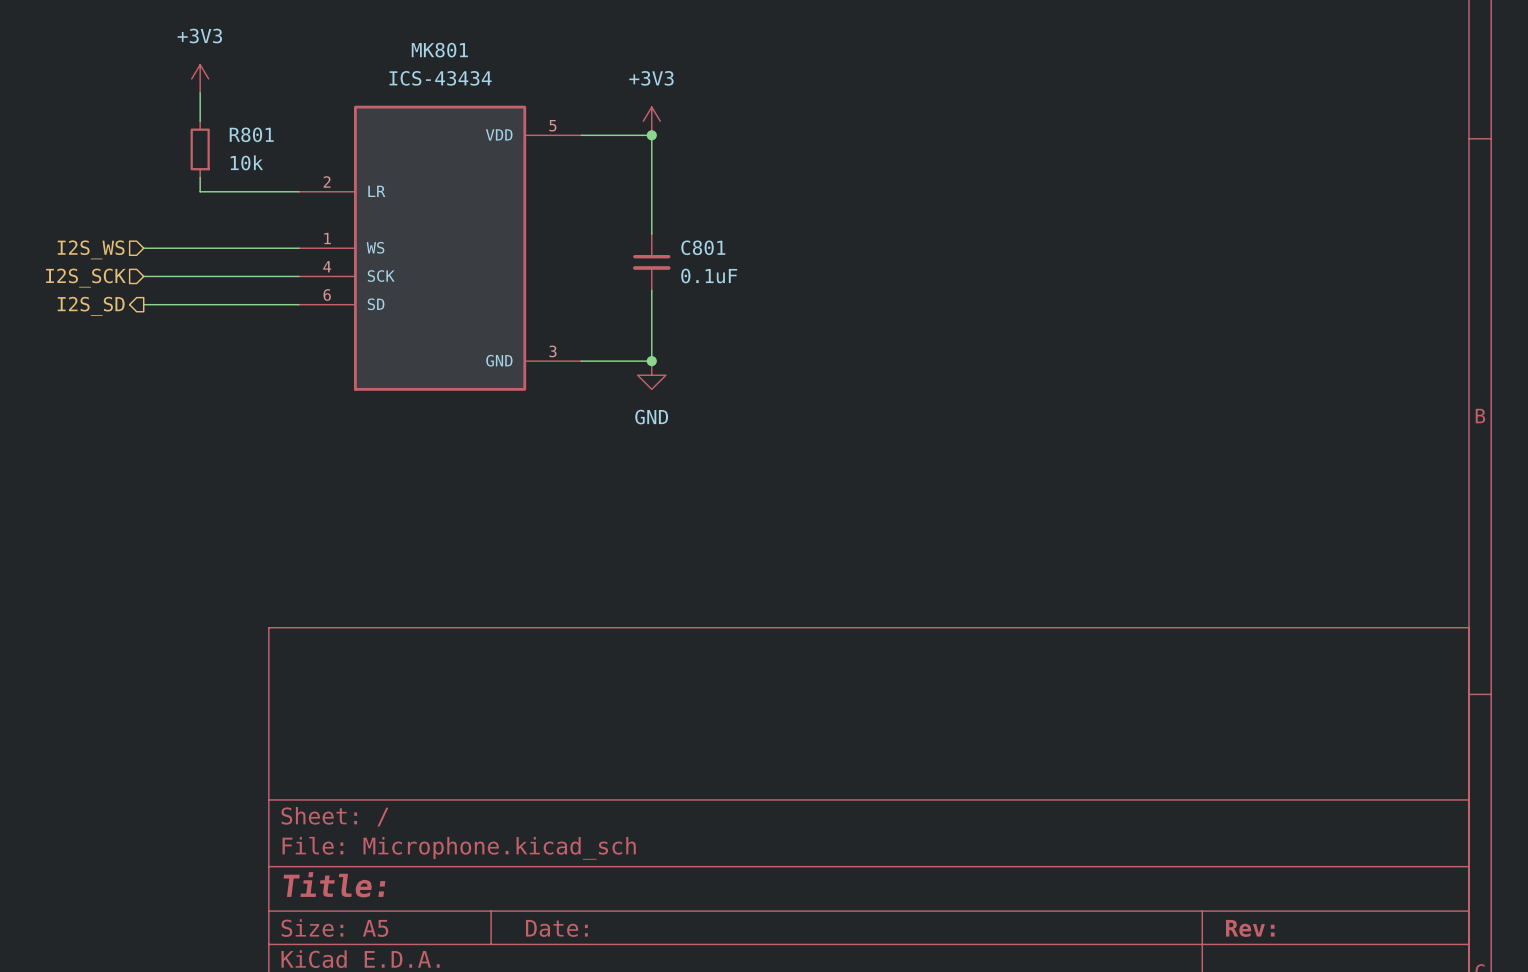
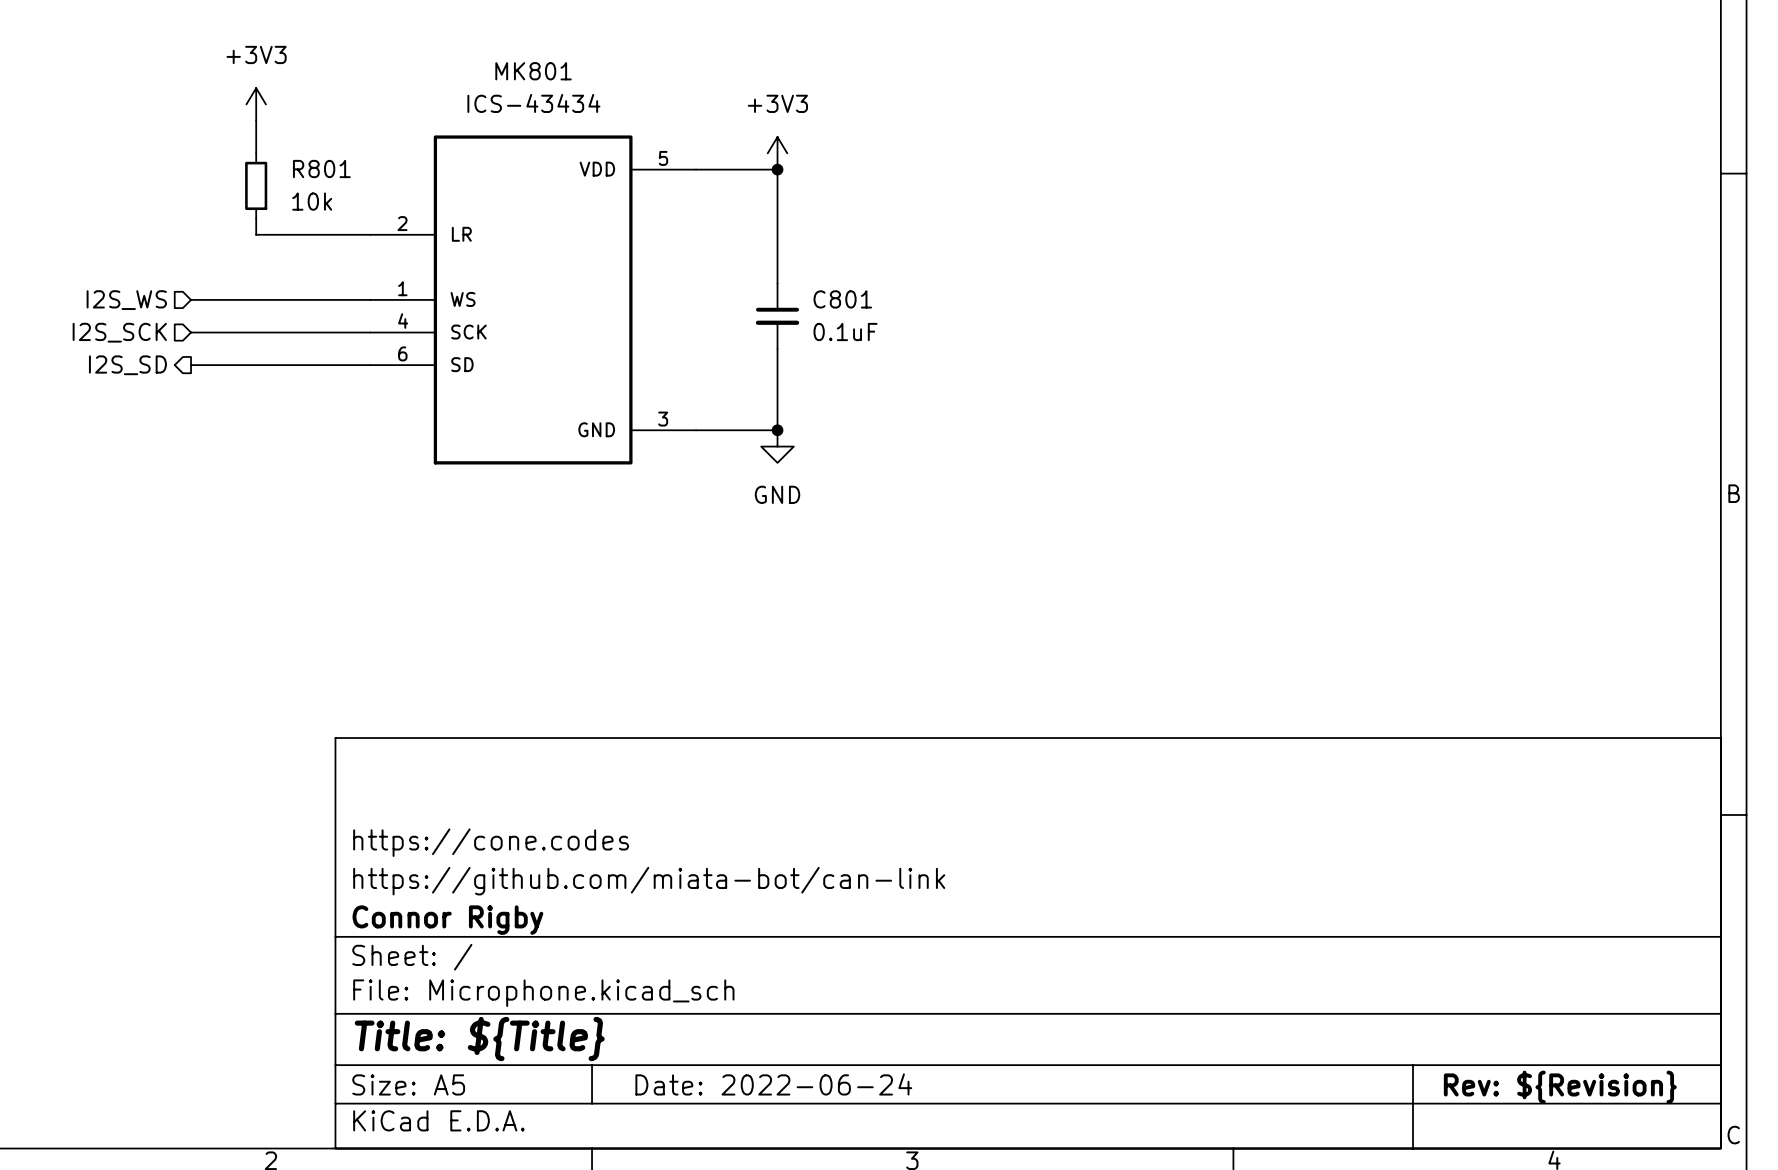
title block: none -> https://cone.codes (491, 842)
title block: none -> https://github.com/miata-bot/can-link (649, 881)
title block: none -> Connor Rigby (447, 920)
title block: Title: (334, 884) -> Title: ${Title} (479, 1039)
title block: Date: (556, 928) -> Date: 2022-06-24 (773, 1084)
title block: Rev: (1250, 928) -> Rev: ${Revision} (1560, 1087)

